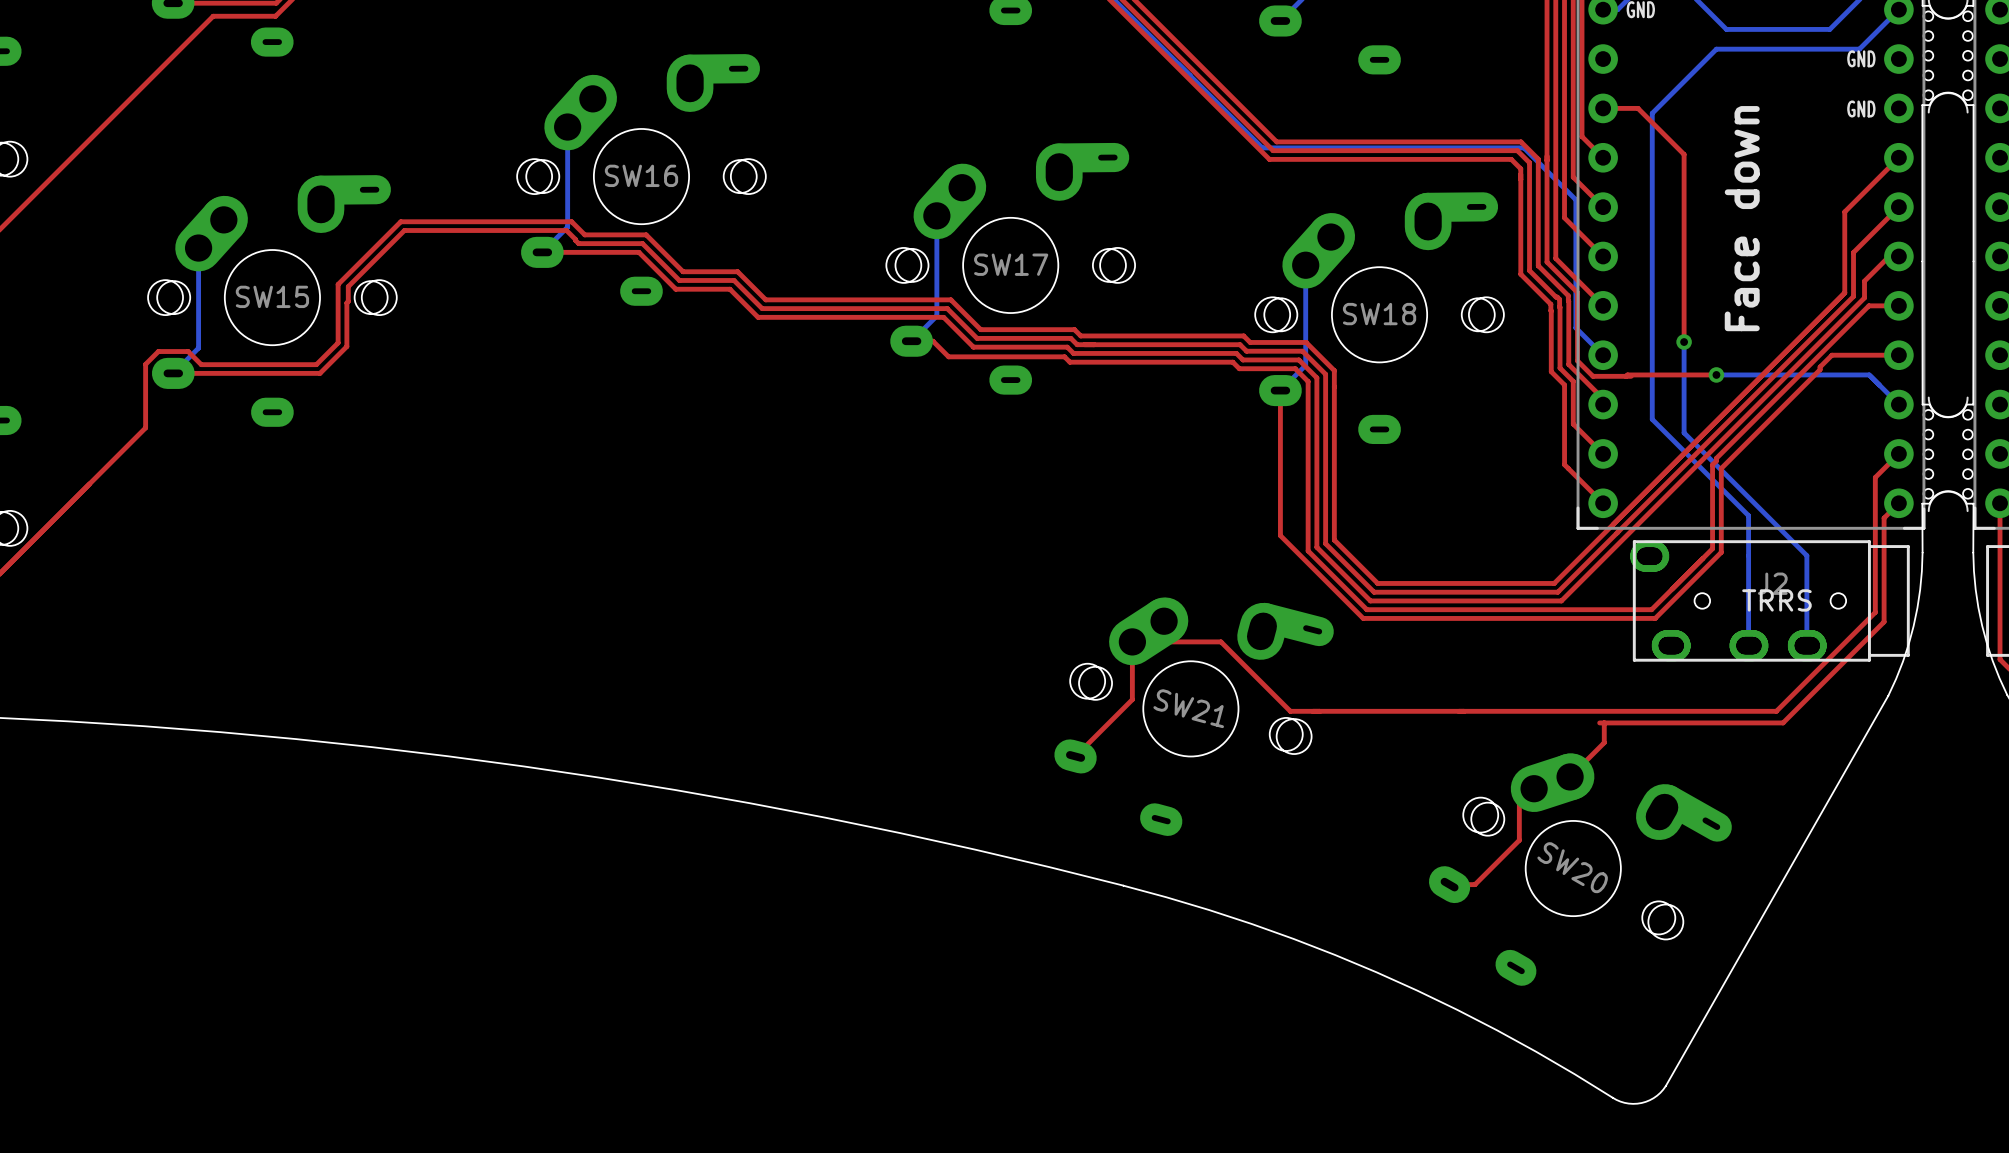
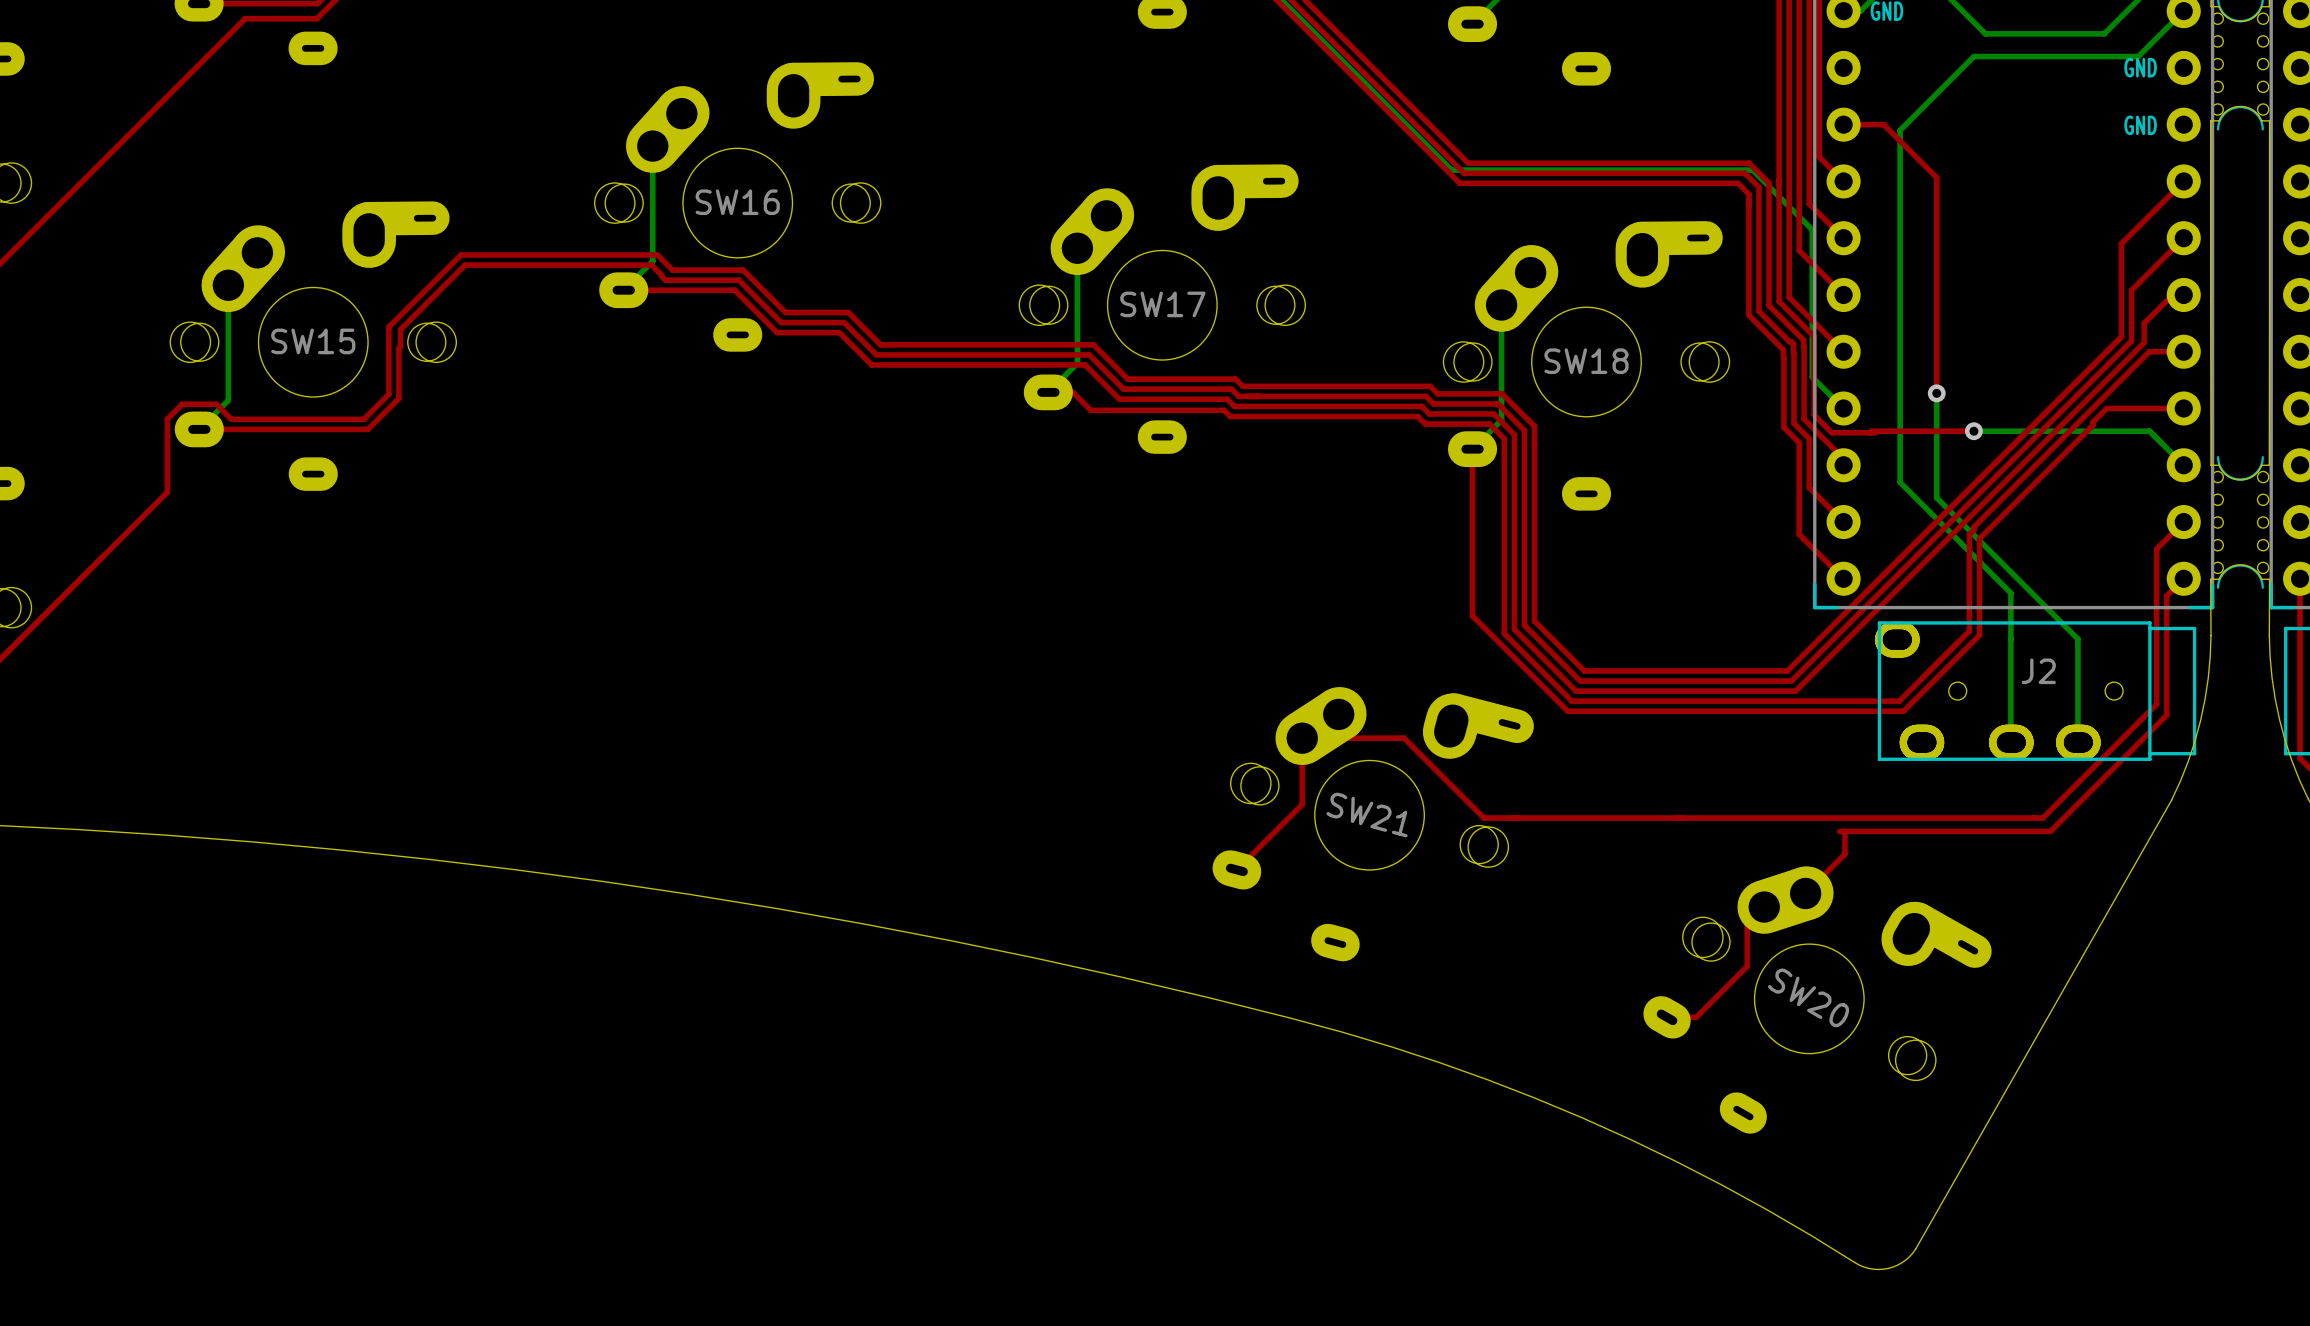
text: Face down (1742, 218) -> none
J2 footprint: [1630, 540, 1910, 662] -> [1875, 621, 2197, 761]

